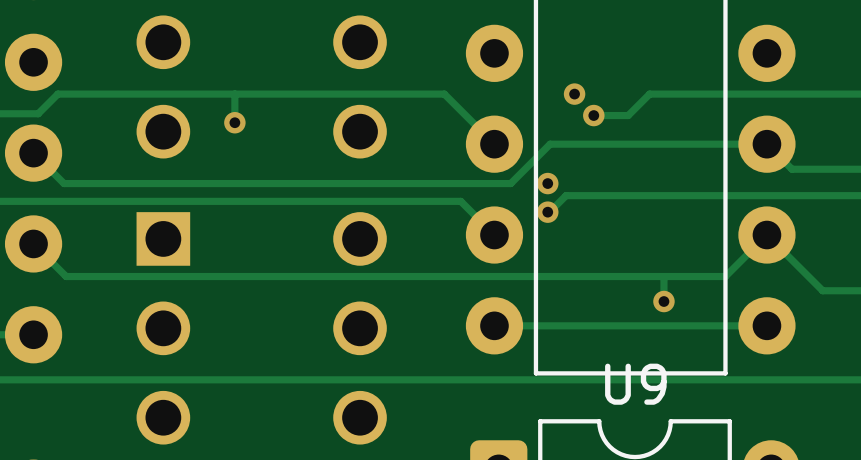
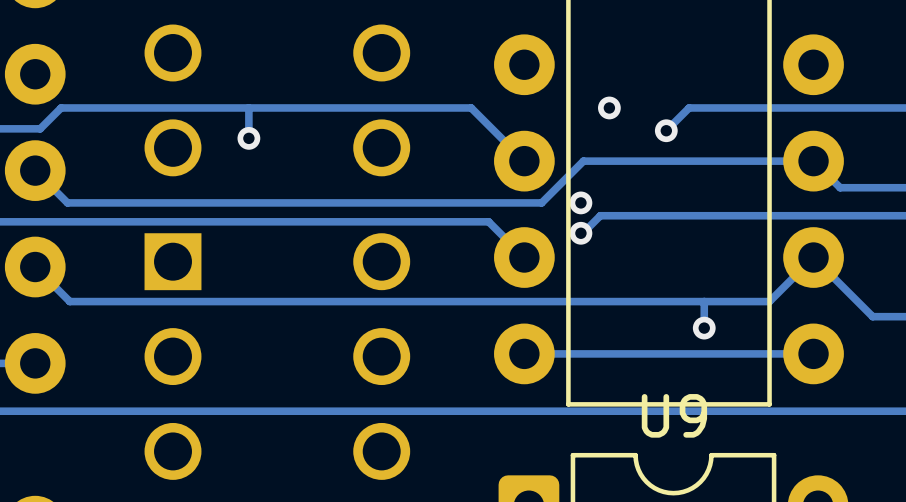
via position: (593, 115) -> (666, 130)
track: (628, 115) (593, 115) -> none

